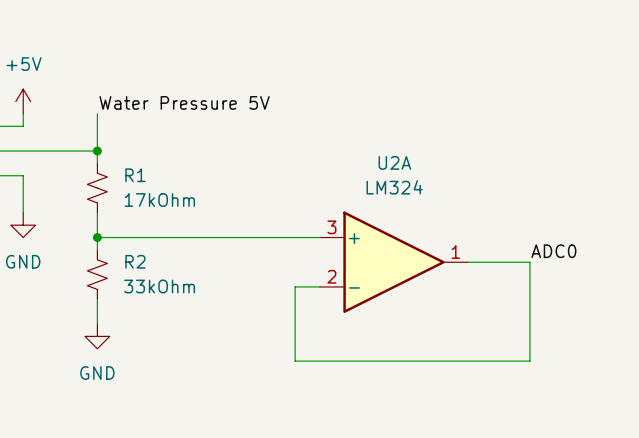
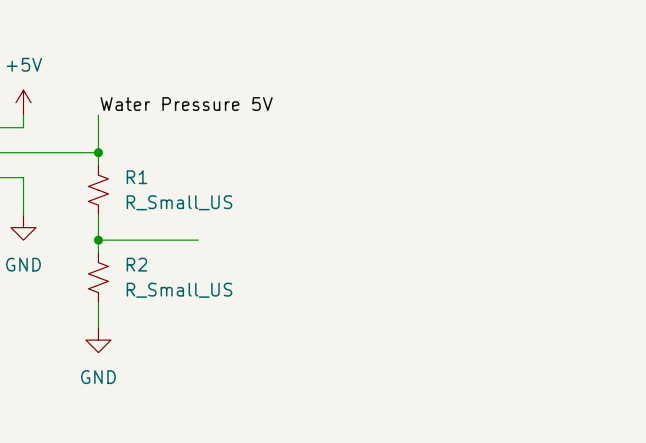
R1 value: 17kOhm (159, 199) -> R_Small_US (179, 202)
wire: (196, 237) (319, 237) -> none
label: ADC0 (553, 251) -> none
U2A: LM324 (394, 262) -> none
wire: (468, 262) (529, 262) (529, 361) (295, 361) (295, 286) (319, 286) -> none
R2 value: 33kOhm (159, 286) -> R_Small_US (179, 290)

